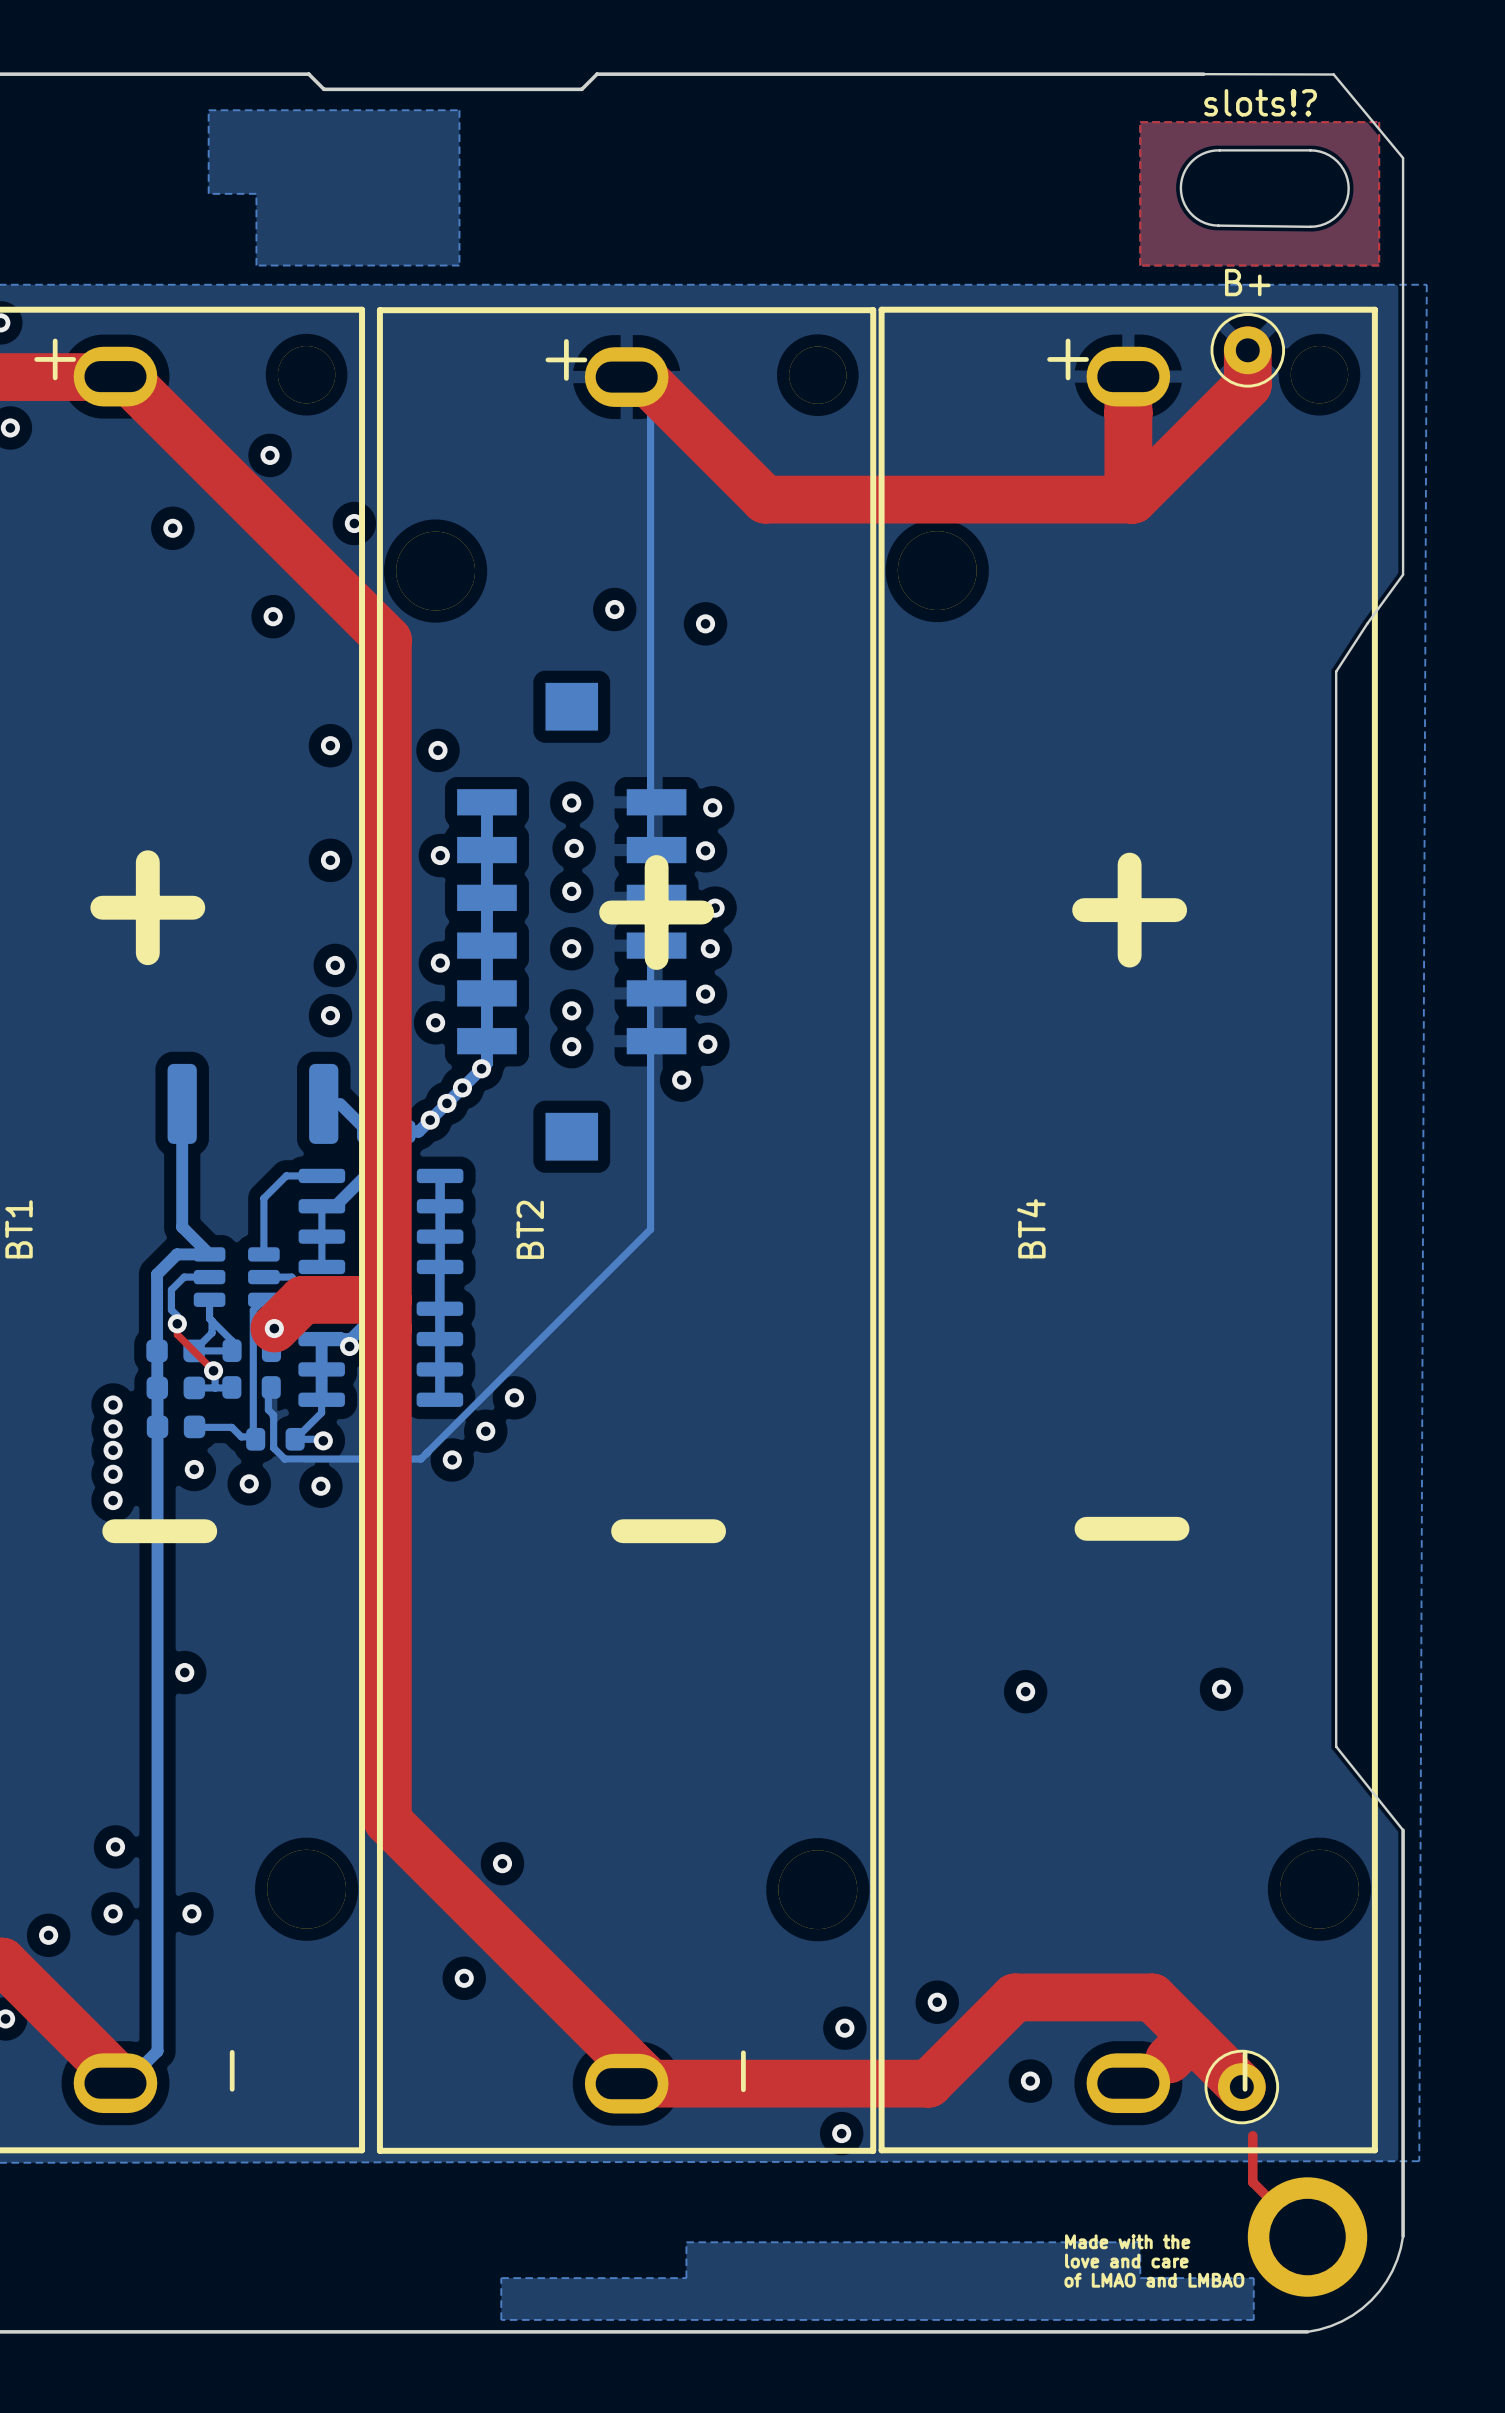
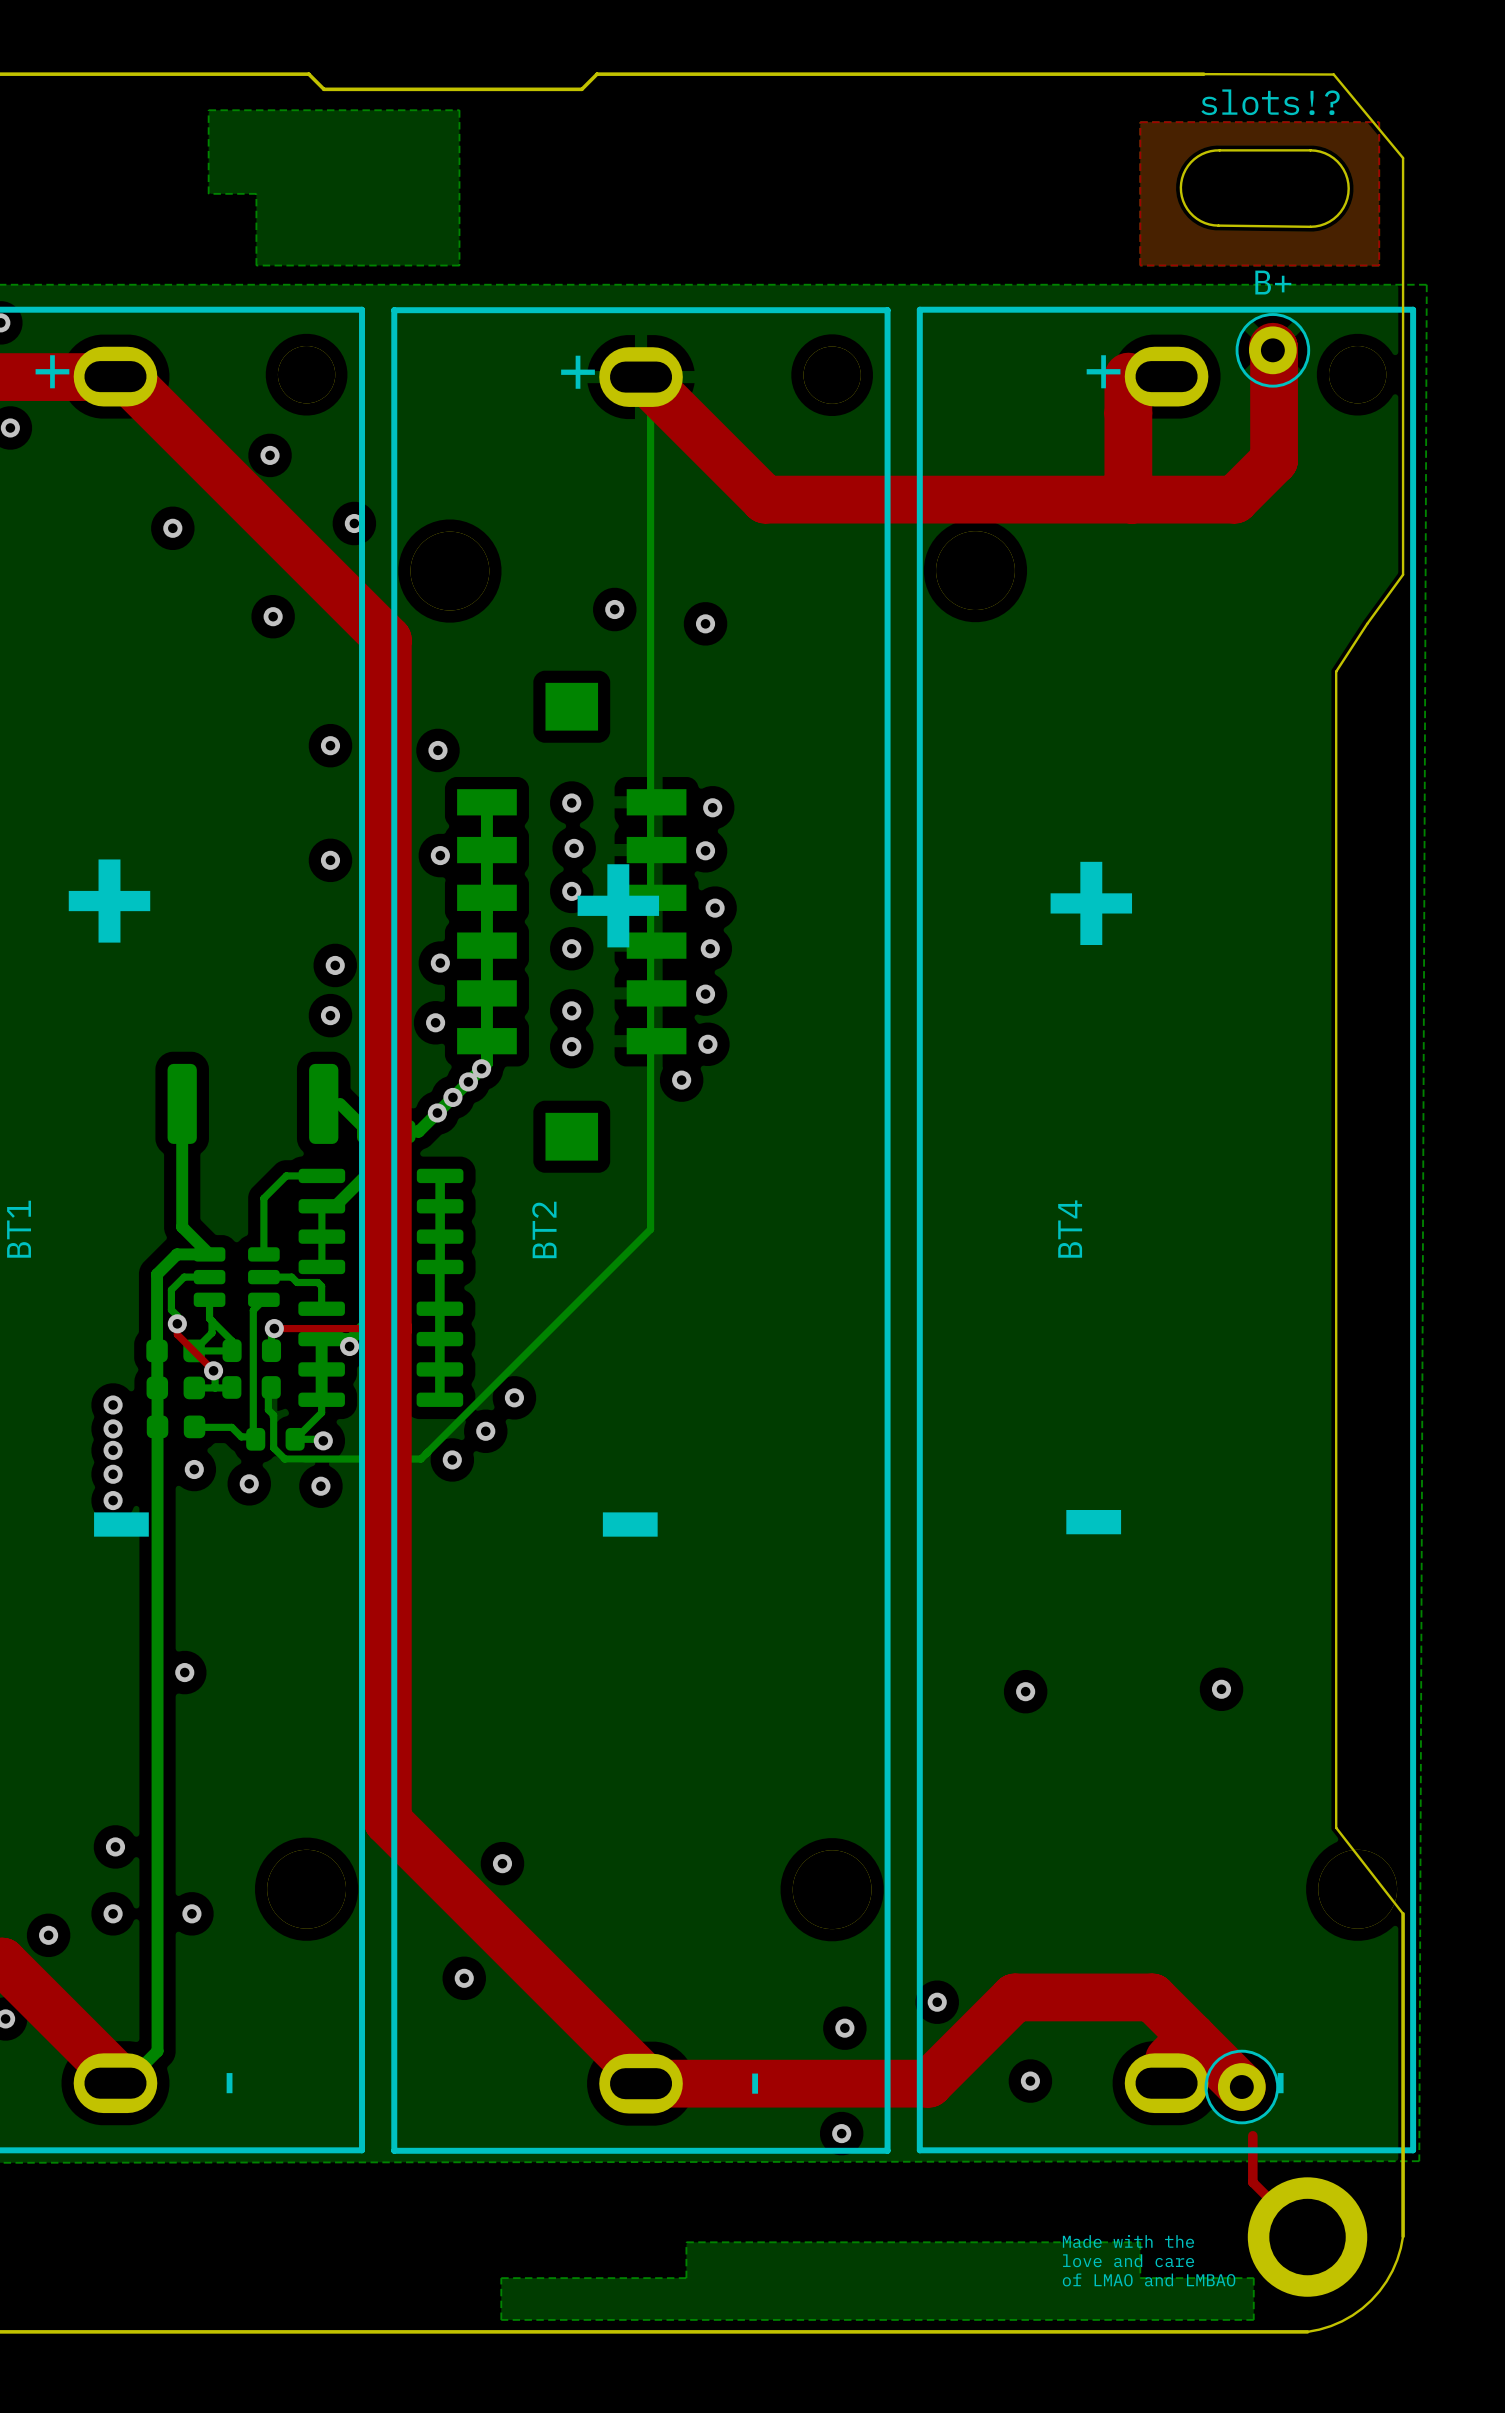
top track: (1247, 350) (1247, 384) (1133, 499) -> (1272, 346) (1274, 460) (1234, 499) (1133, 499)
part position: (1247, 350) -> (1272, 350)
via: none -> (468, 1081)
via: (462, 1087) -> none
via: none -> (452, 1097)
via: (446, 1103) -> none
via: none -> (437, 1112)
via: (430, 1120) -> none
BT2 position: (626, 1230) -> (640, 1230)
BT4 position: (1128, 1230) -> (1166, 1230)
top track: (387, 1299) (303, 1299) (274, 1328) -> (387, 1328) (274, 1328)
board edge: (1336, 1746) (1403, 1830) (1403, 1913) -> (1336, 1746) (1336, 1827) (1403, 1913)

